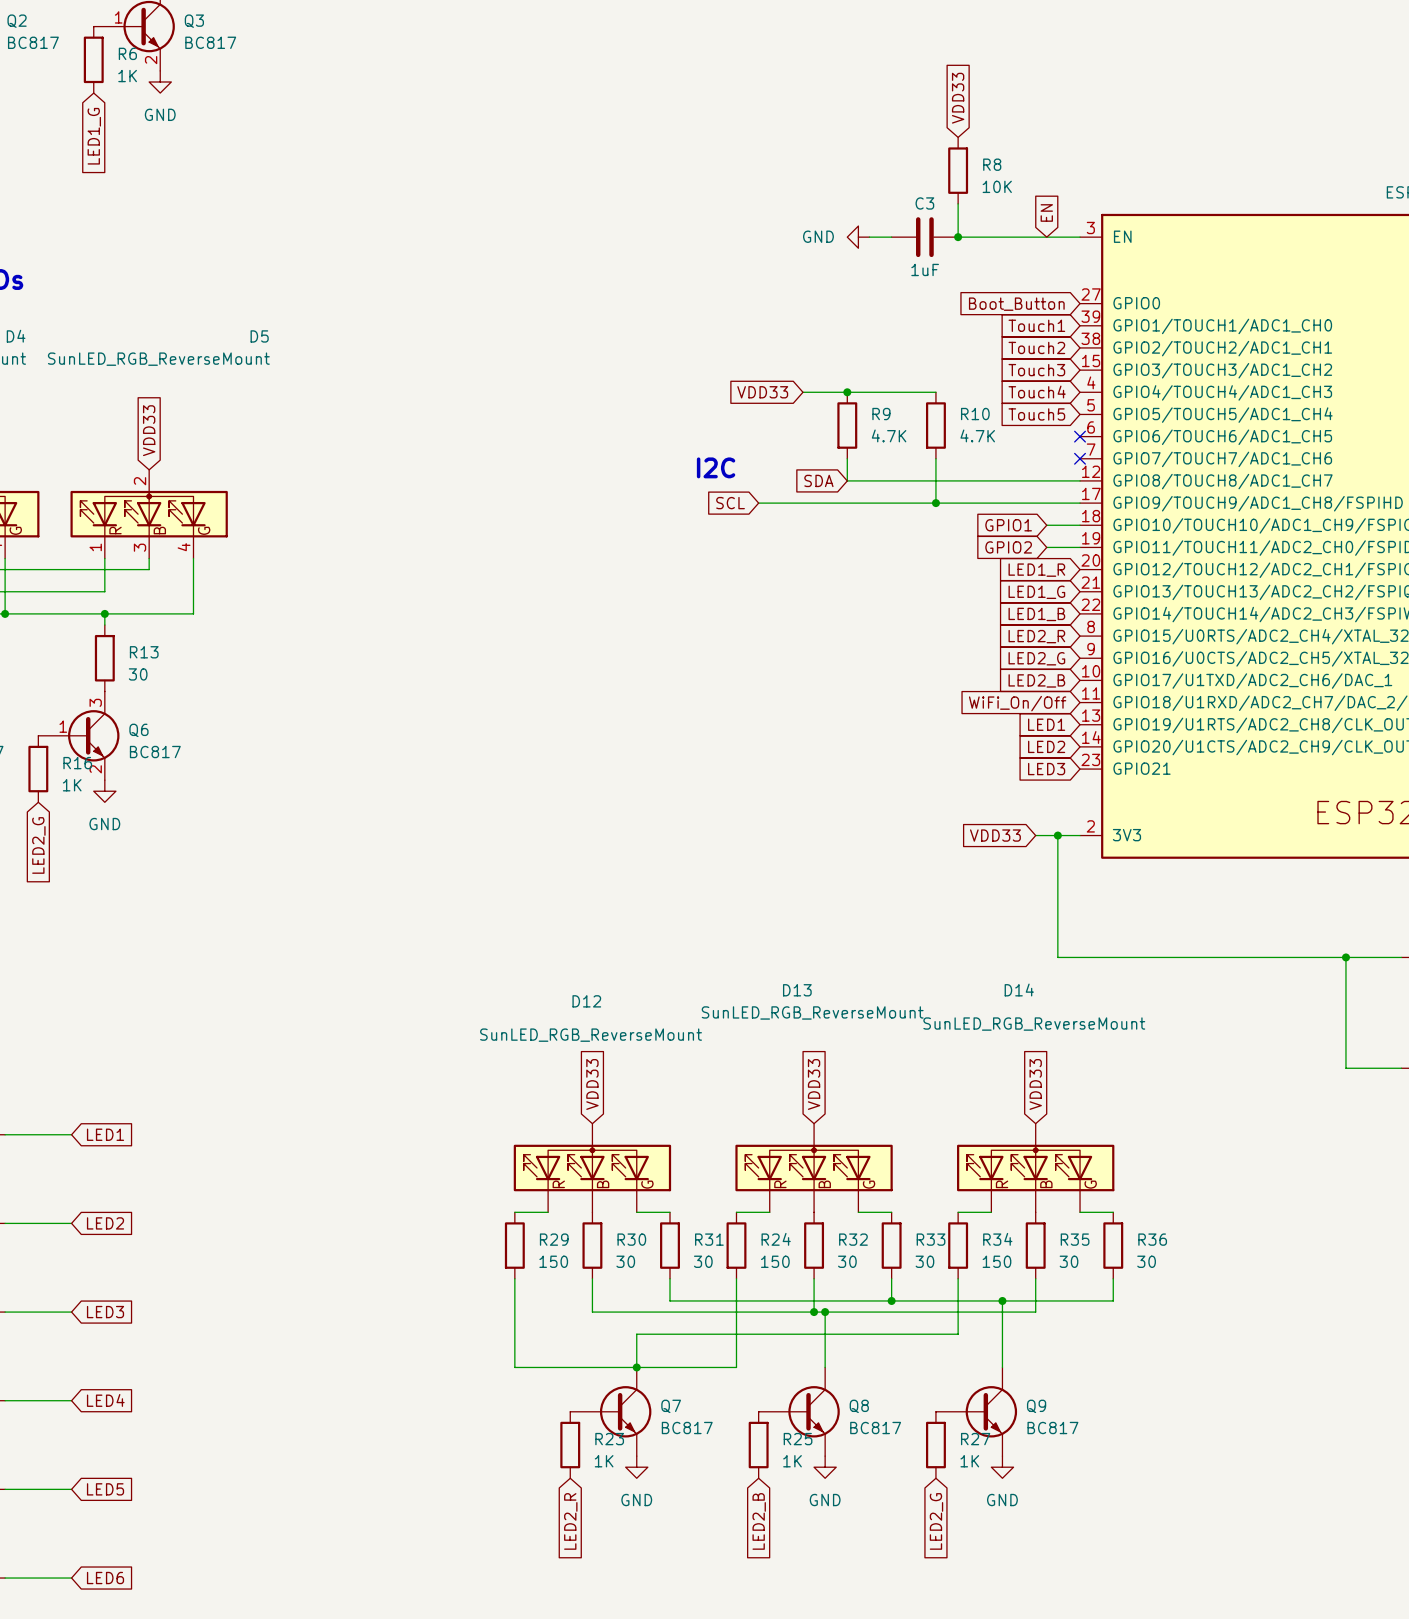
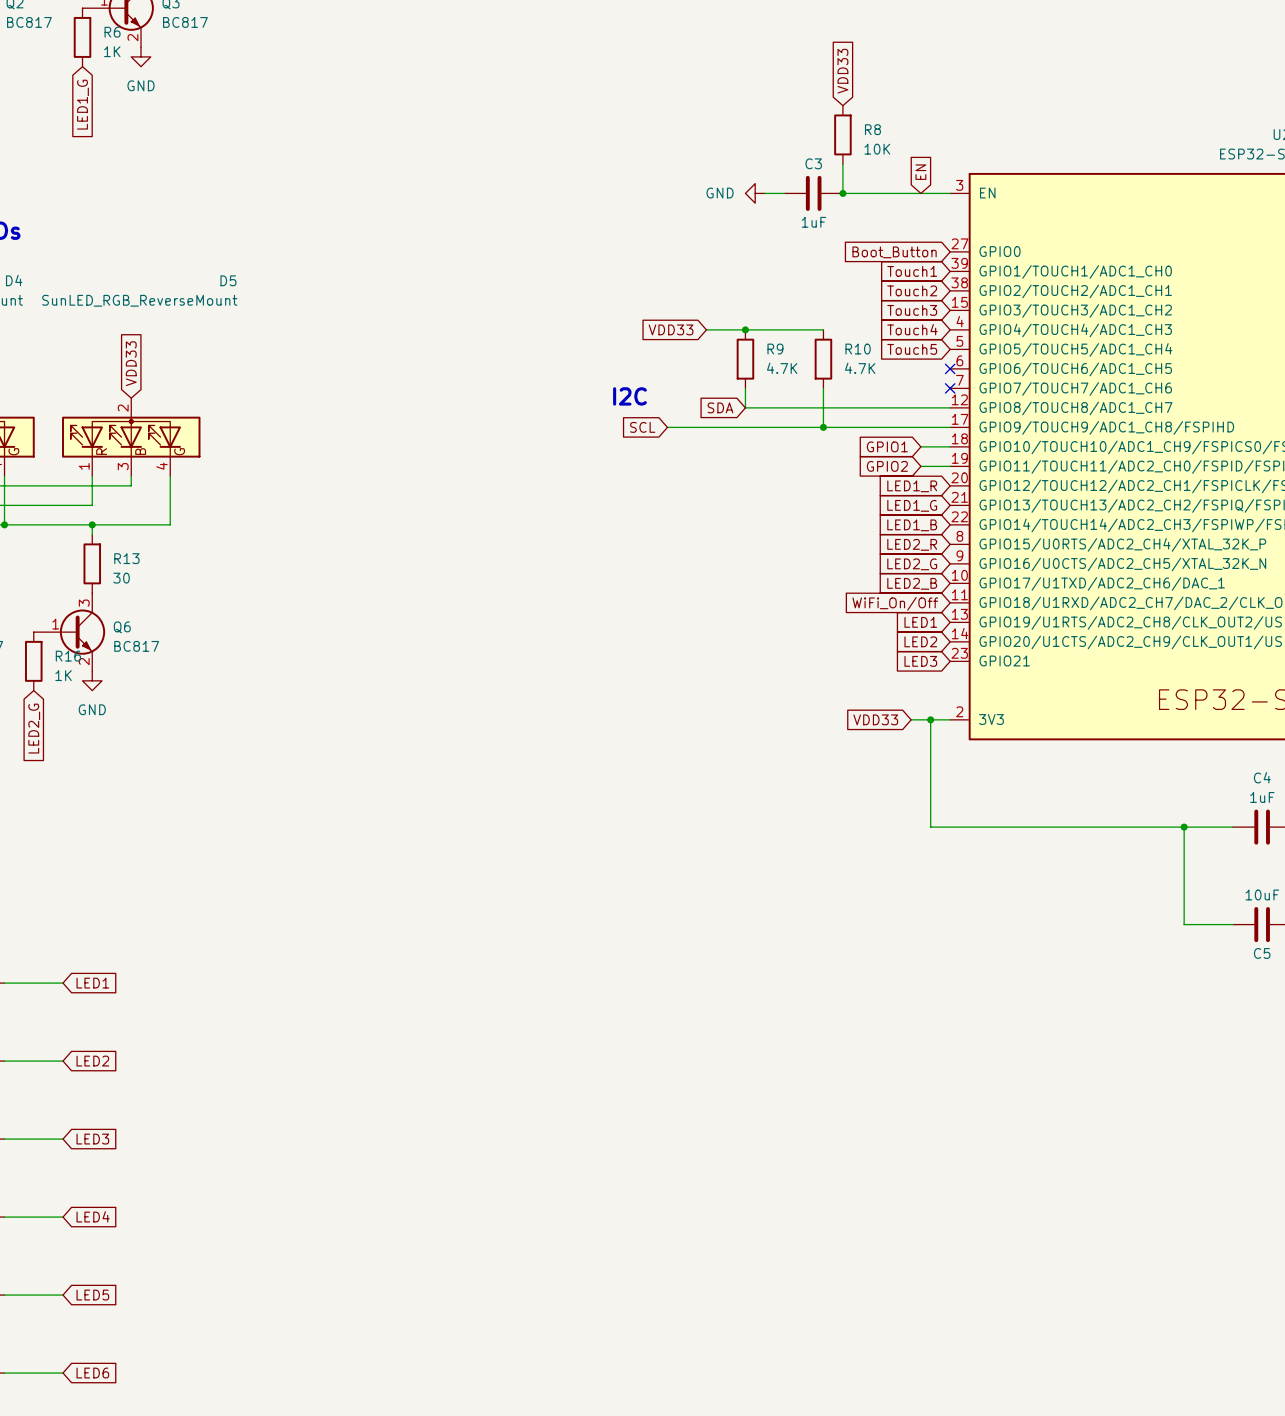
global label: VDD33 (592, 1084) -> none
global label: VDD33 (814, 1084) -> none
global label: VDD33 (1035, 1084) -> none
D12: SunLED_RGB_ReverseMount (592, 1168) -> none
D13: SunLED_RGB_ReverseMount (814, 1168) -> none
D14: SunLED_RGB_ReverseMount (1035, 1168) -> none
wire: (514, 1212) (548, 1212) -> none
wire: (636, 1212) (670, 1212) -> none
wire: (736, 1212) (769, 1212) -> none
wire: (858, 1212) (891, 1212) -> none
wire: (958, 1212) (991, 1212) -> none
wire: (1080, 1212) (1113, 1212) -> none
R29: 150 (514, 1245) -> none
R30: 30 (592, 1245) -> none
R31: 30 (670, 1245) -> none
R24: 150 (736, 1245) -> none
R32: 30 (814, 1245) -> none
R33: 30 (891, 1245) -> none
R34: 150 (958, 1245) -> none
R35: 30 (1035, 1245) -> none
R36: 30 (1113, 1245) -> none
wire: (514, 1278) (514, 1367) (736, 1367) (736, 1278) -> none
wire: (592, 1278) (592, 1312) (1035, 1312) (1035, 1278) -> none
wire: (670, 1278) (670, 1300) (1113, 1300) (1113, 1278) -> none
wire: (814, 1278) (814, 1312) -> none
wire: (891, 1278) (891, 1300) -> none
wire: (958, 1278) (958, 1334) (636, 1334) (636, 1367) -> none
junction: (891, 1300) -> none
wire: (1002, 1300) (1002, 1367) -> none
junction: (1002, 1300) -> none
junction: (814, 1312) -> none
wire: (825, 1312) (825, 1367) -> none
junction: (825, 1312) -> none
junction: (636, 1367) -> none
Q7: BC817 (610, 1411) -> none
Q8: BC817 (799, 1411) -> none
Q9: BC817 (976, 1411) -> none
R23: 1K (570, 1445) -> none
R25: 1K (758, 1445) -> none
R27: 1K (935, 1445) -> none
power symbol: GND (636, 1467) -> none
power symbol: GND (825, 1467) -> none
power symbol: GND (1002, 1467) -> none
global label: LED2_R (570, 1521) -> none
global label: LED2_B (759, 1521) -> none
global label: LED2_G (936, 1521) -> none

